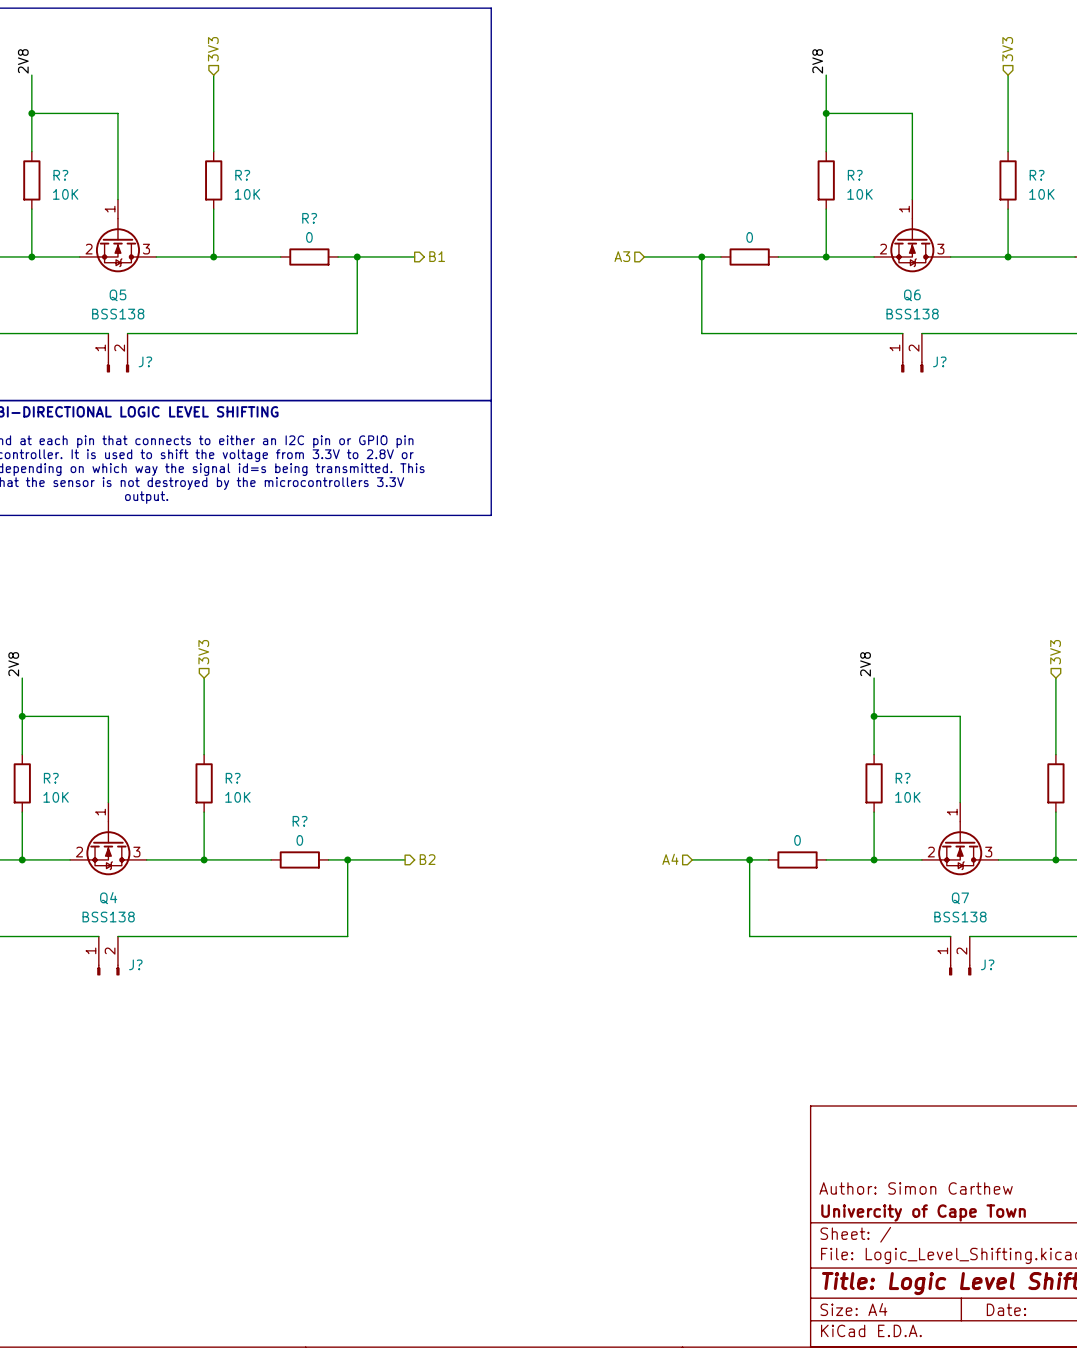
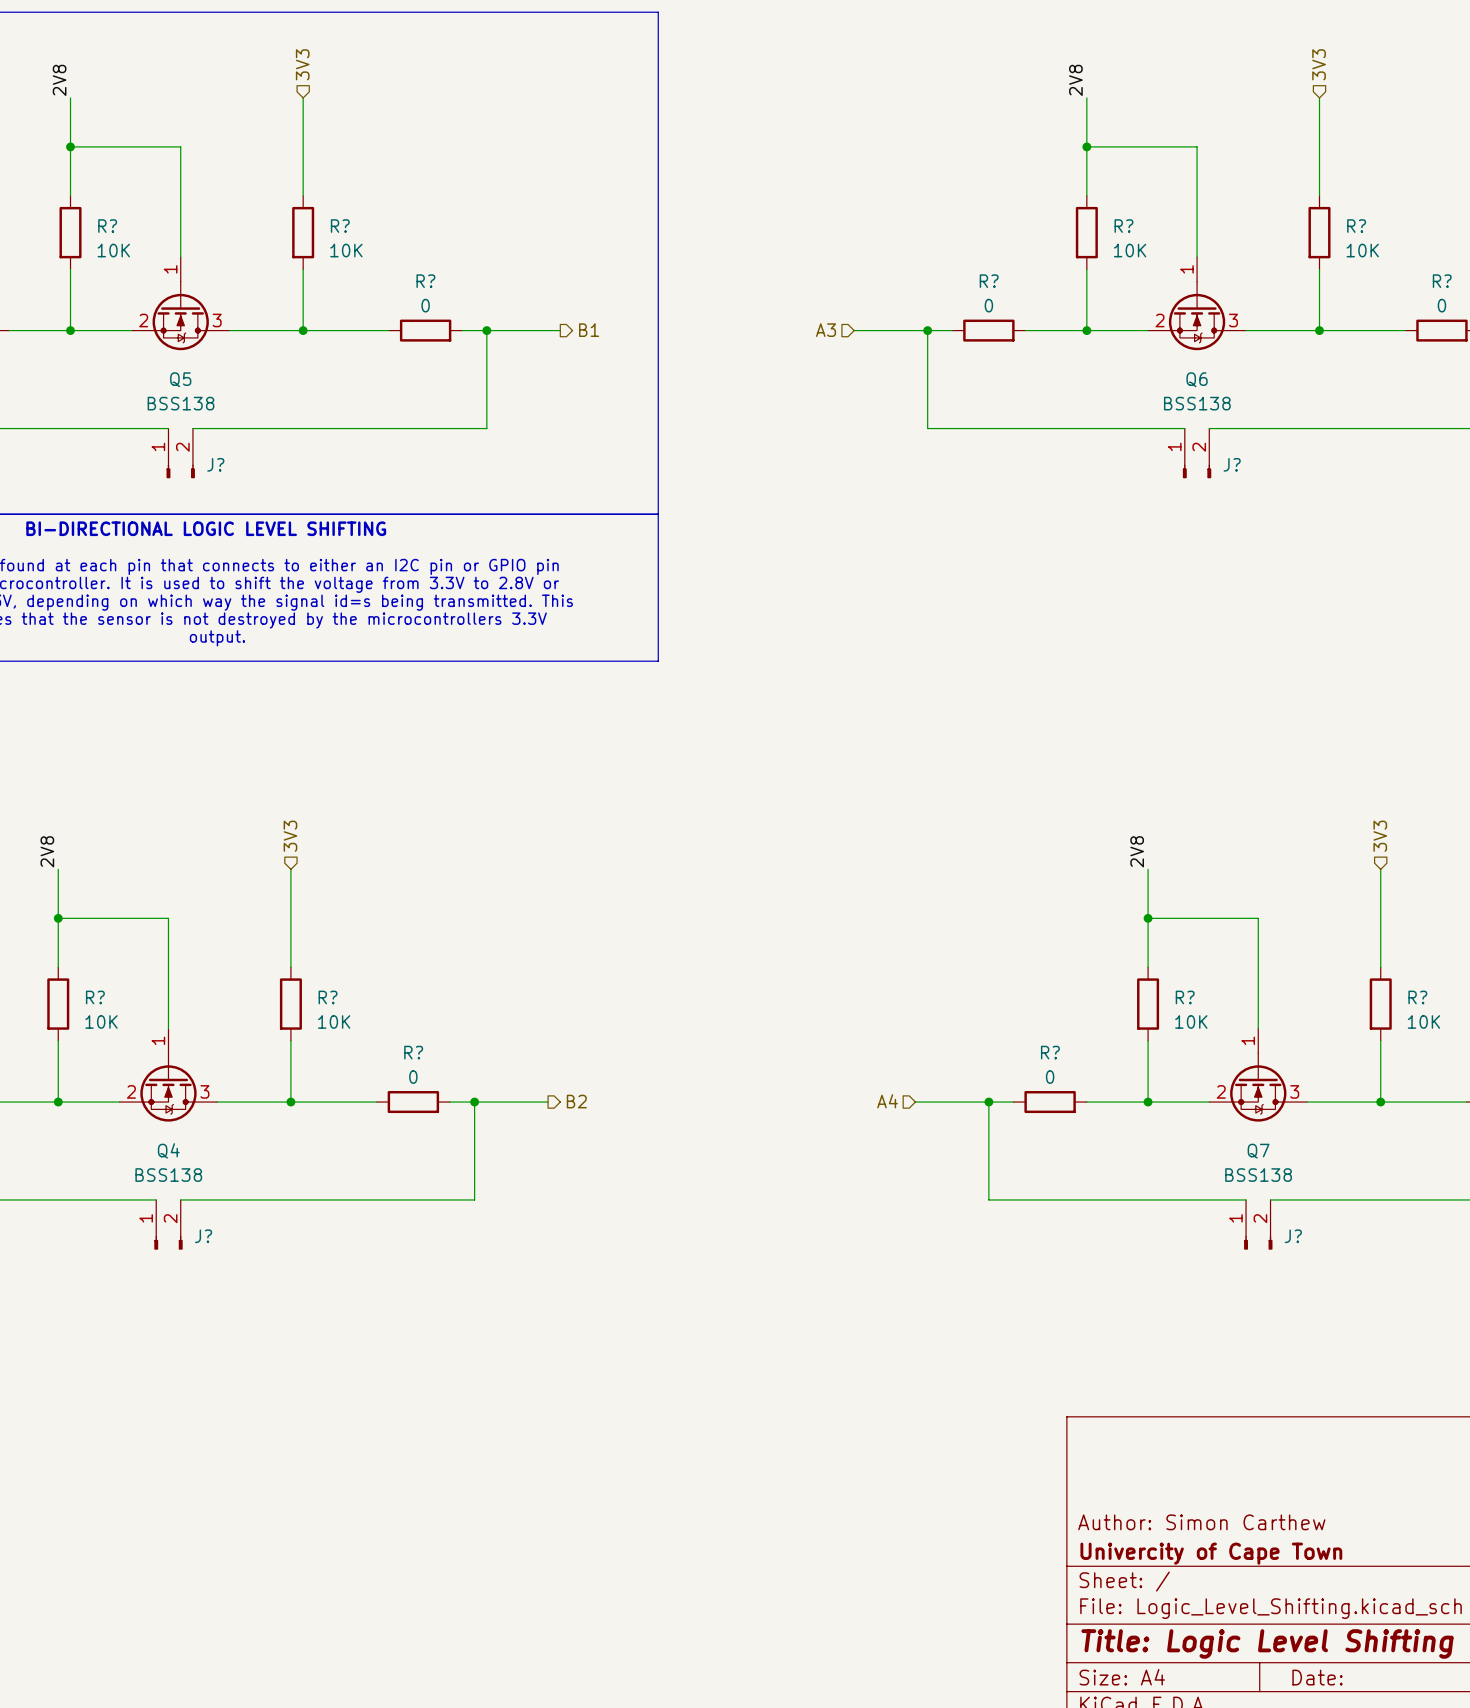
R? name: none -> R? (989, 281)
R? name: none -> R? (1050, 1052)

